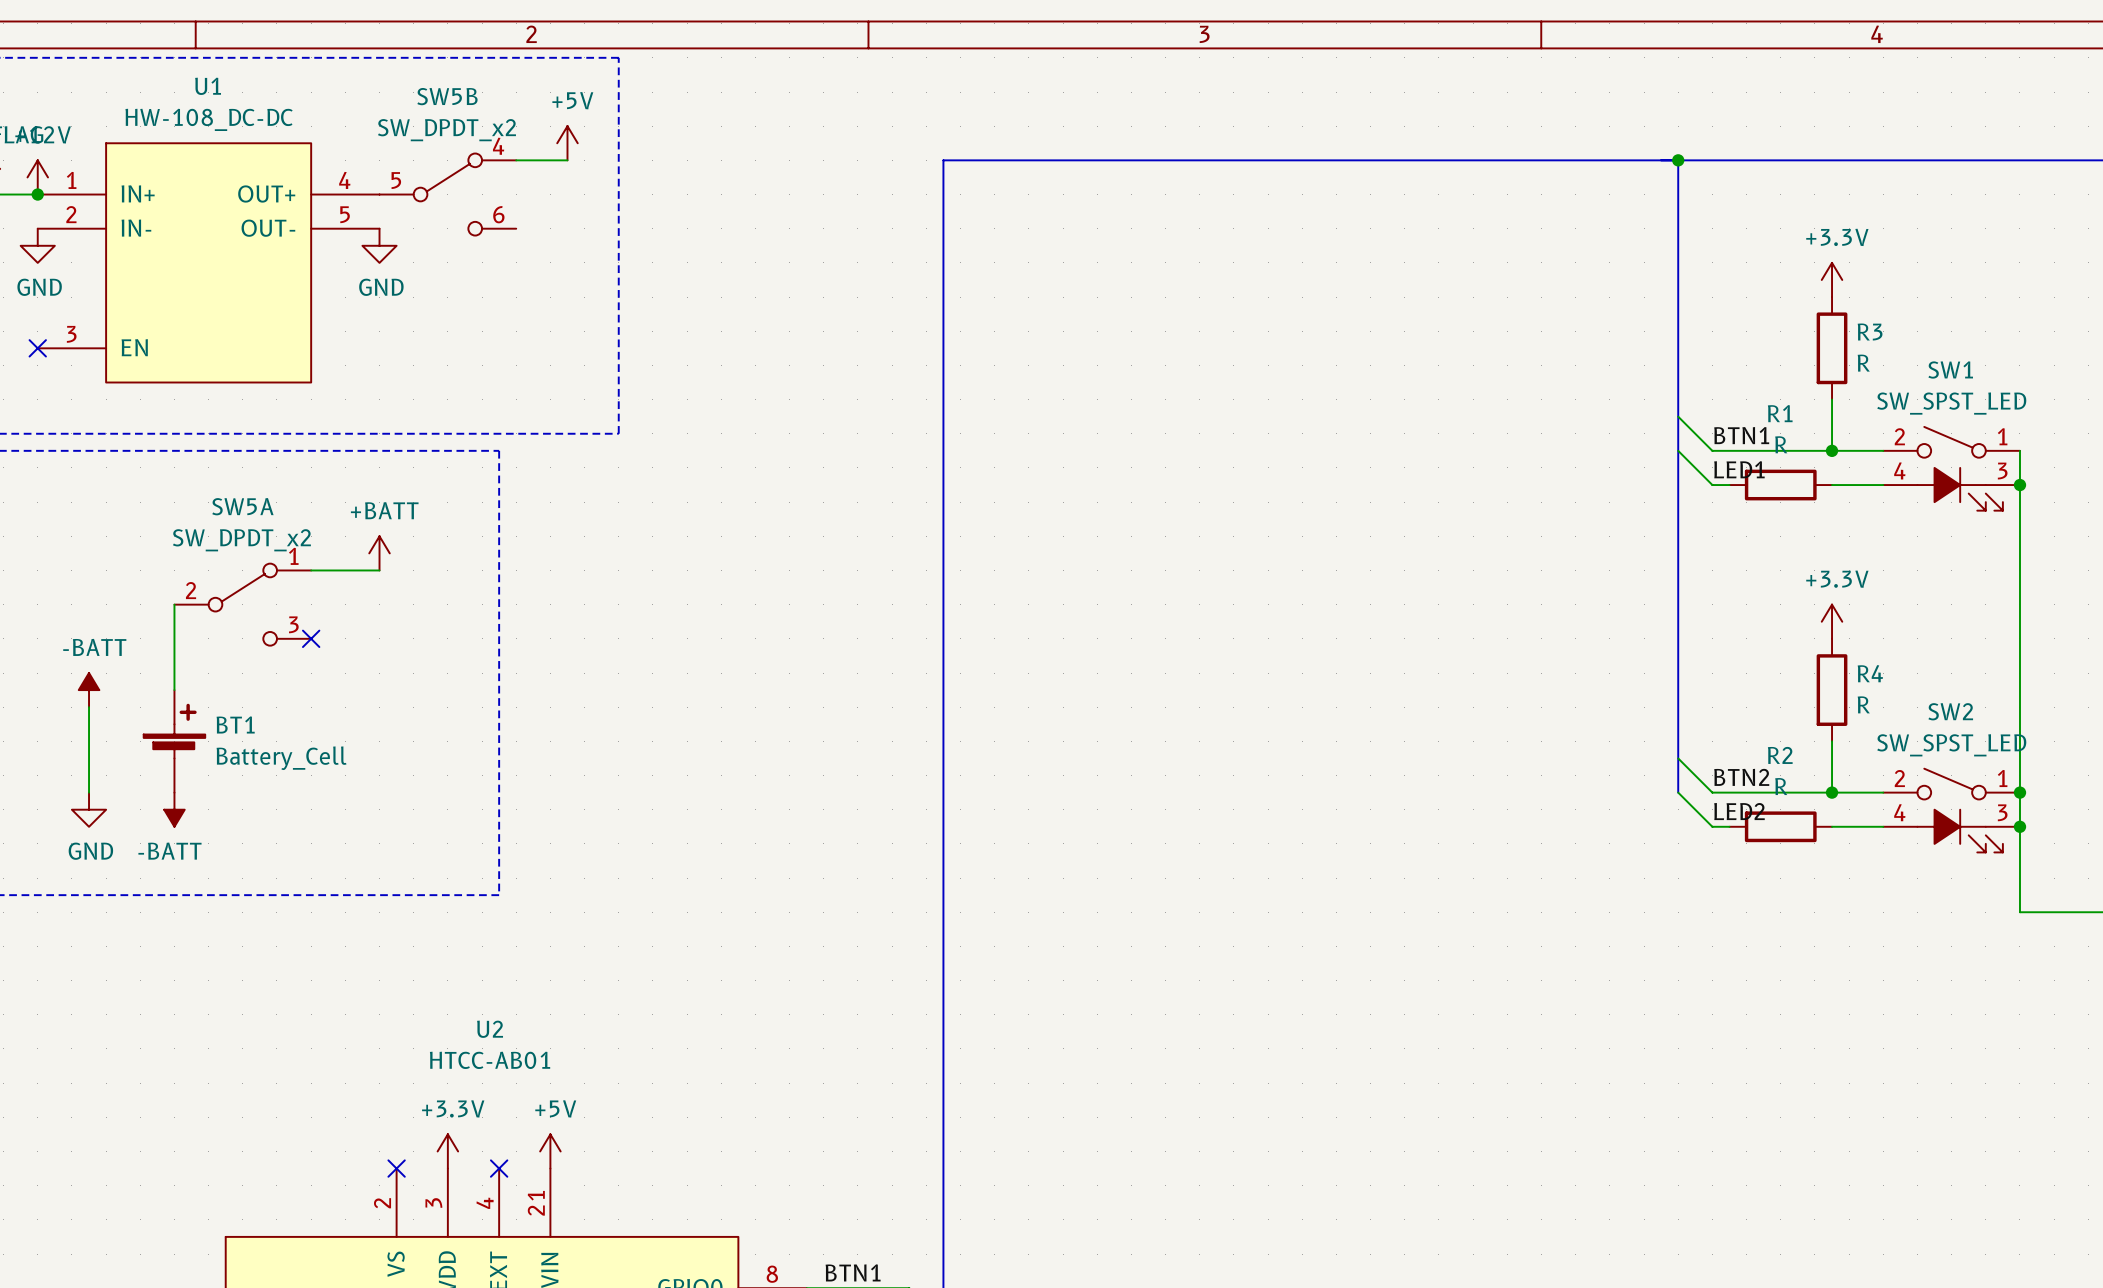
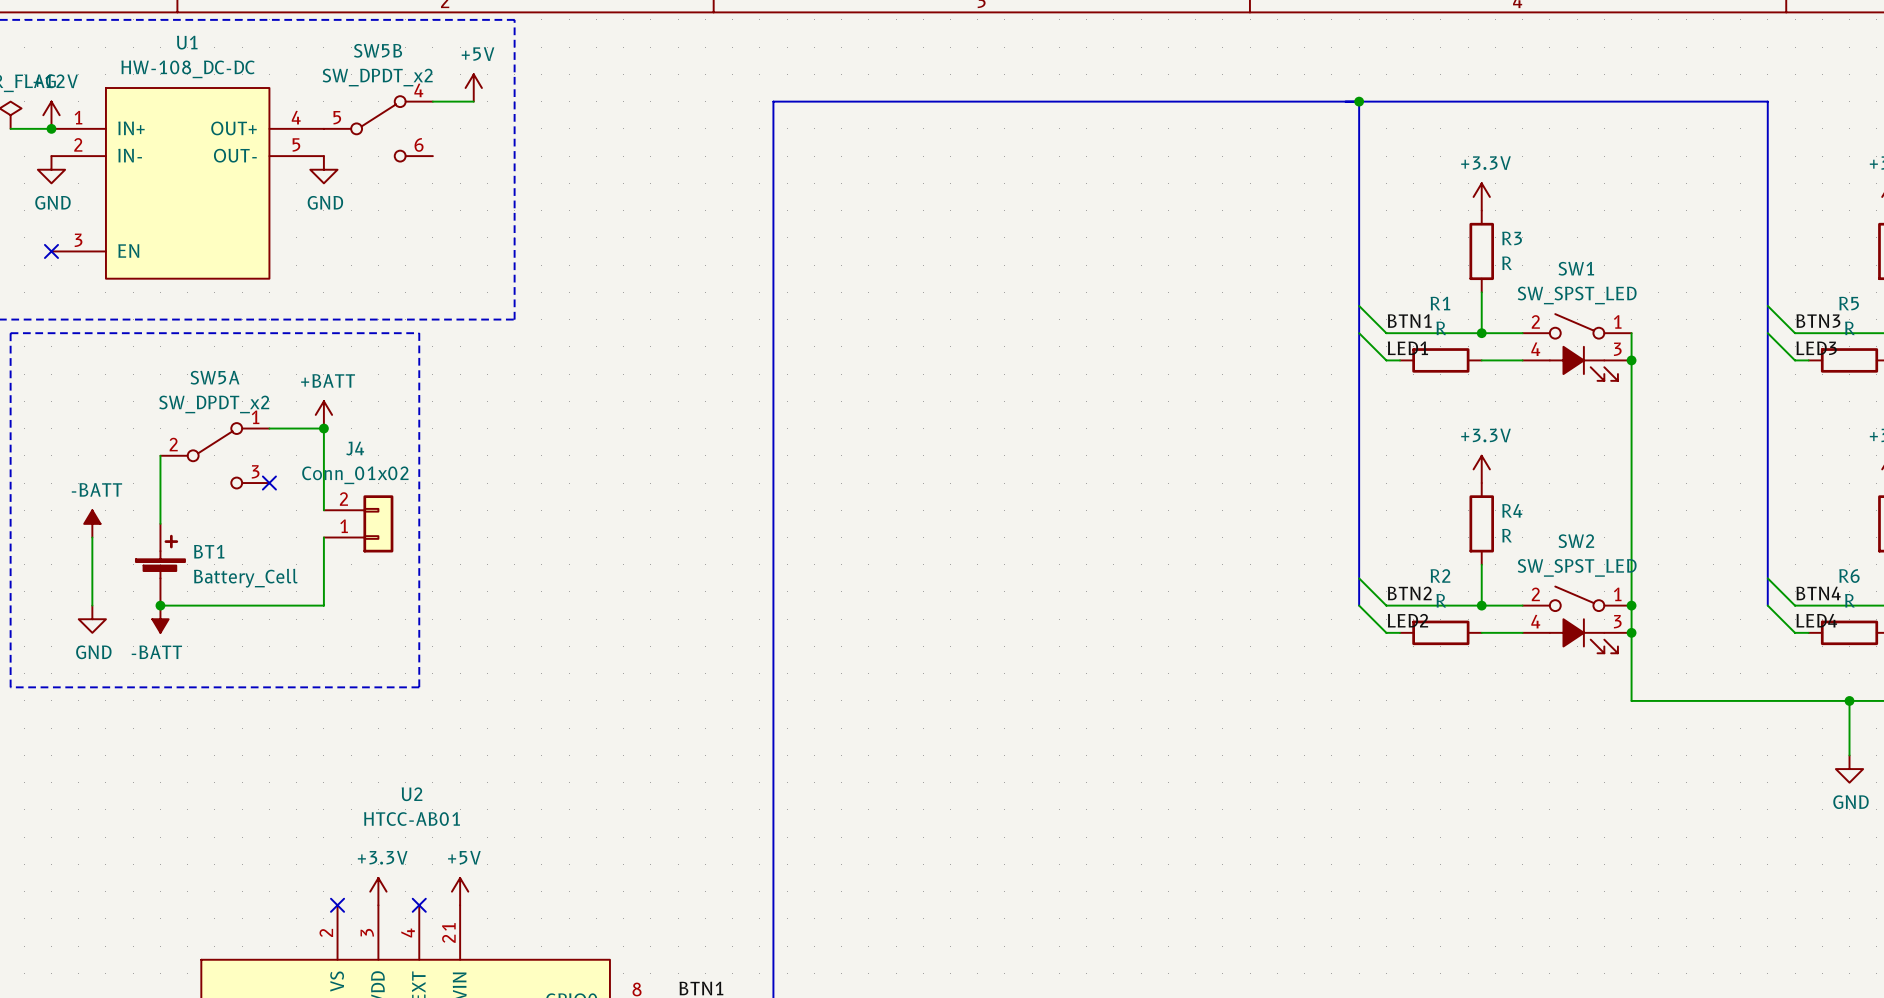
wire: none -> (323, 428) (323, 510)
junction: none -> (323, 428)
J4: none -> Conn_01x02 (358, 523)
wire: none -> (323, 537) (323, 605) (160, 605)
junction: none -> (160, 605)

